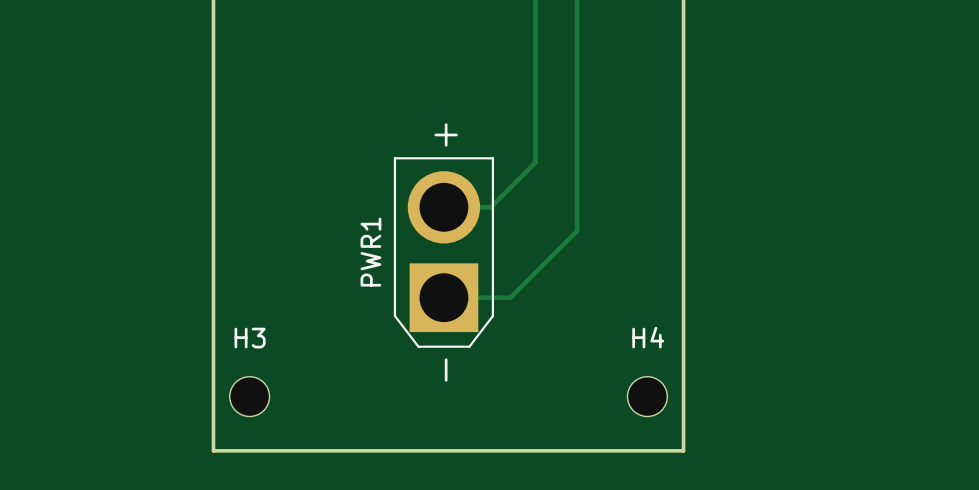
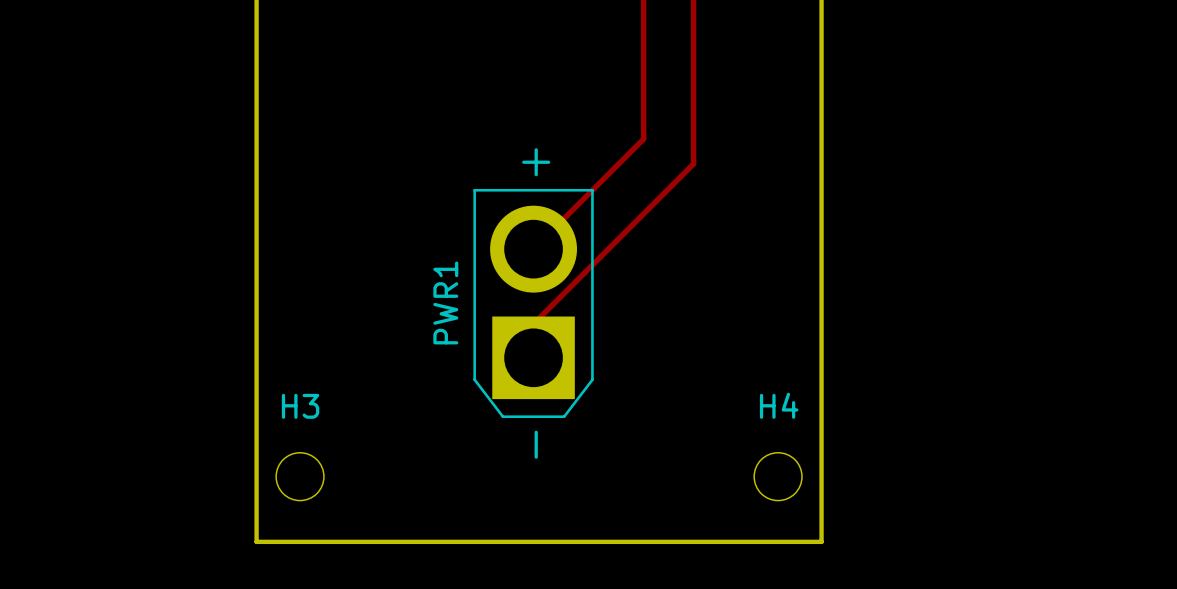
track: (535, 115) (535, 162) (490, 207) (443, 207) -> (643, 139) (533, 249)
track: (577, 136) (577, 231) (510, 297) (443, 297) -> (693, 163) (533, 323) (533, 357)

